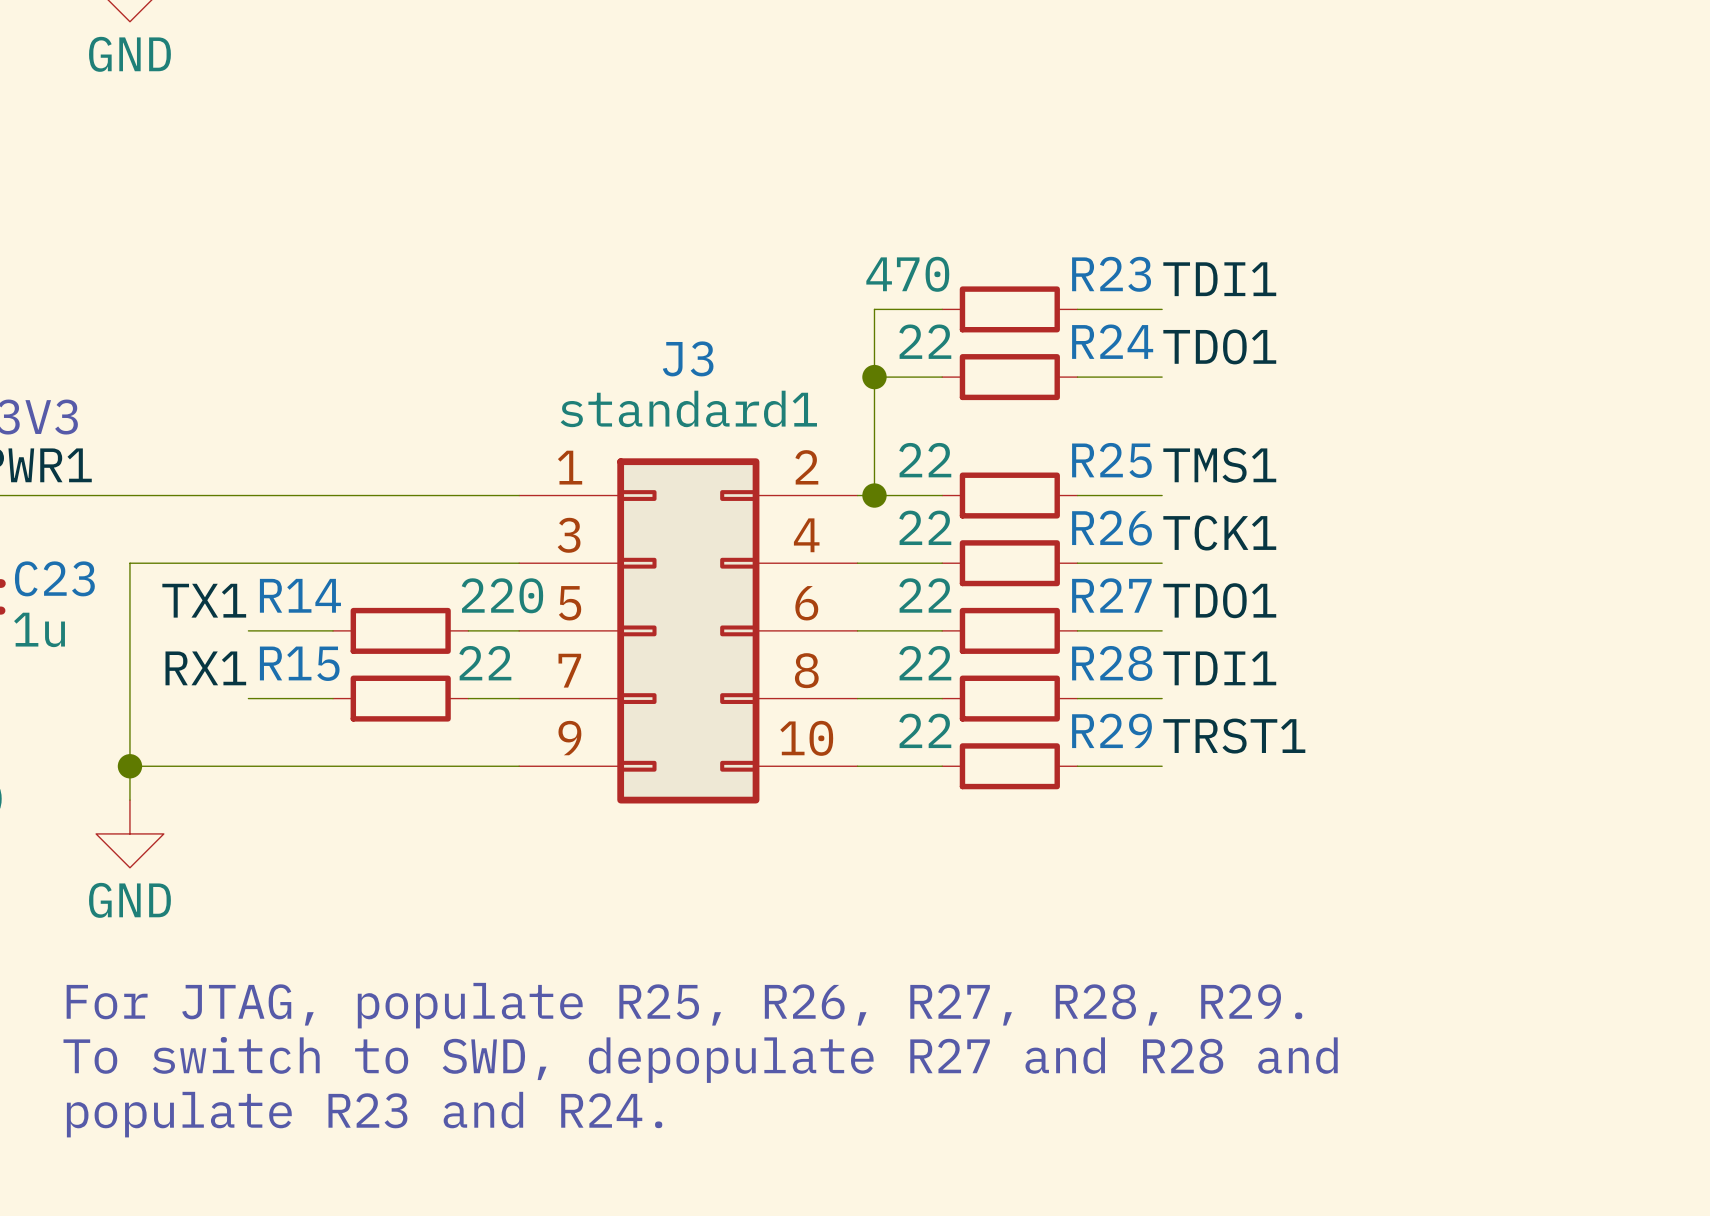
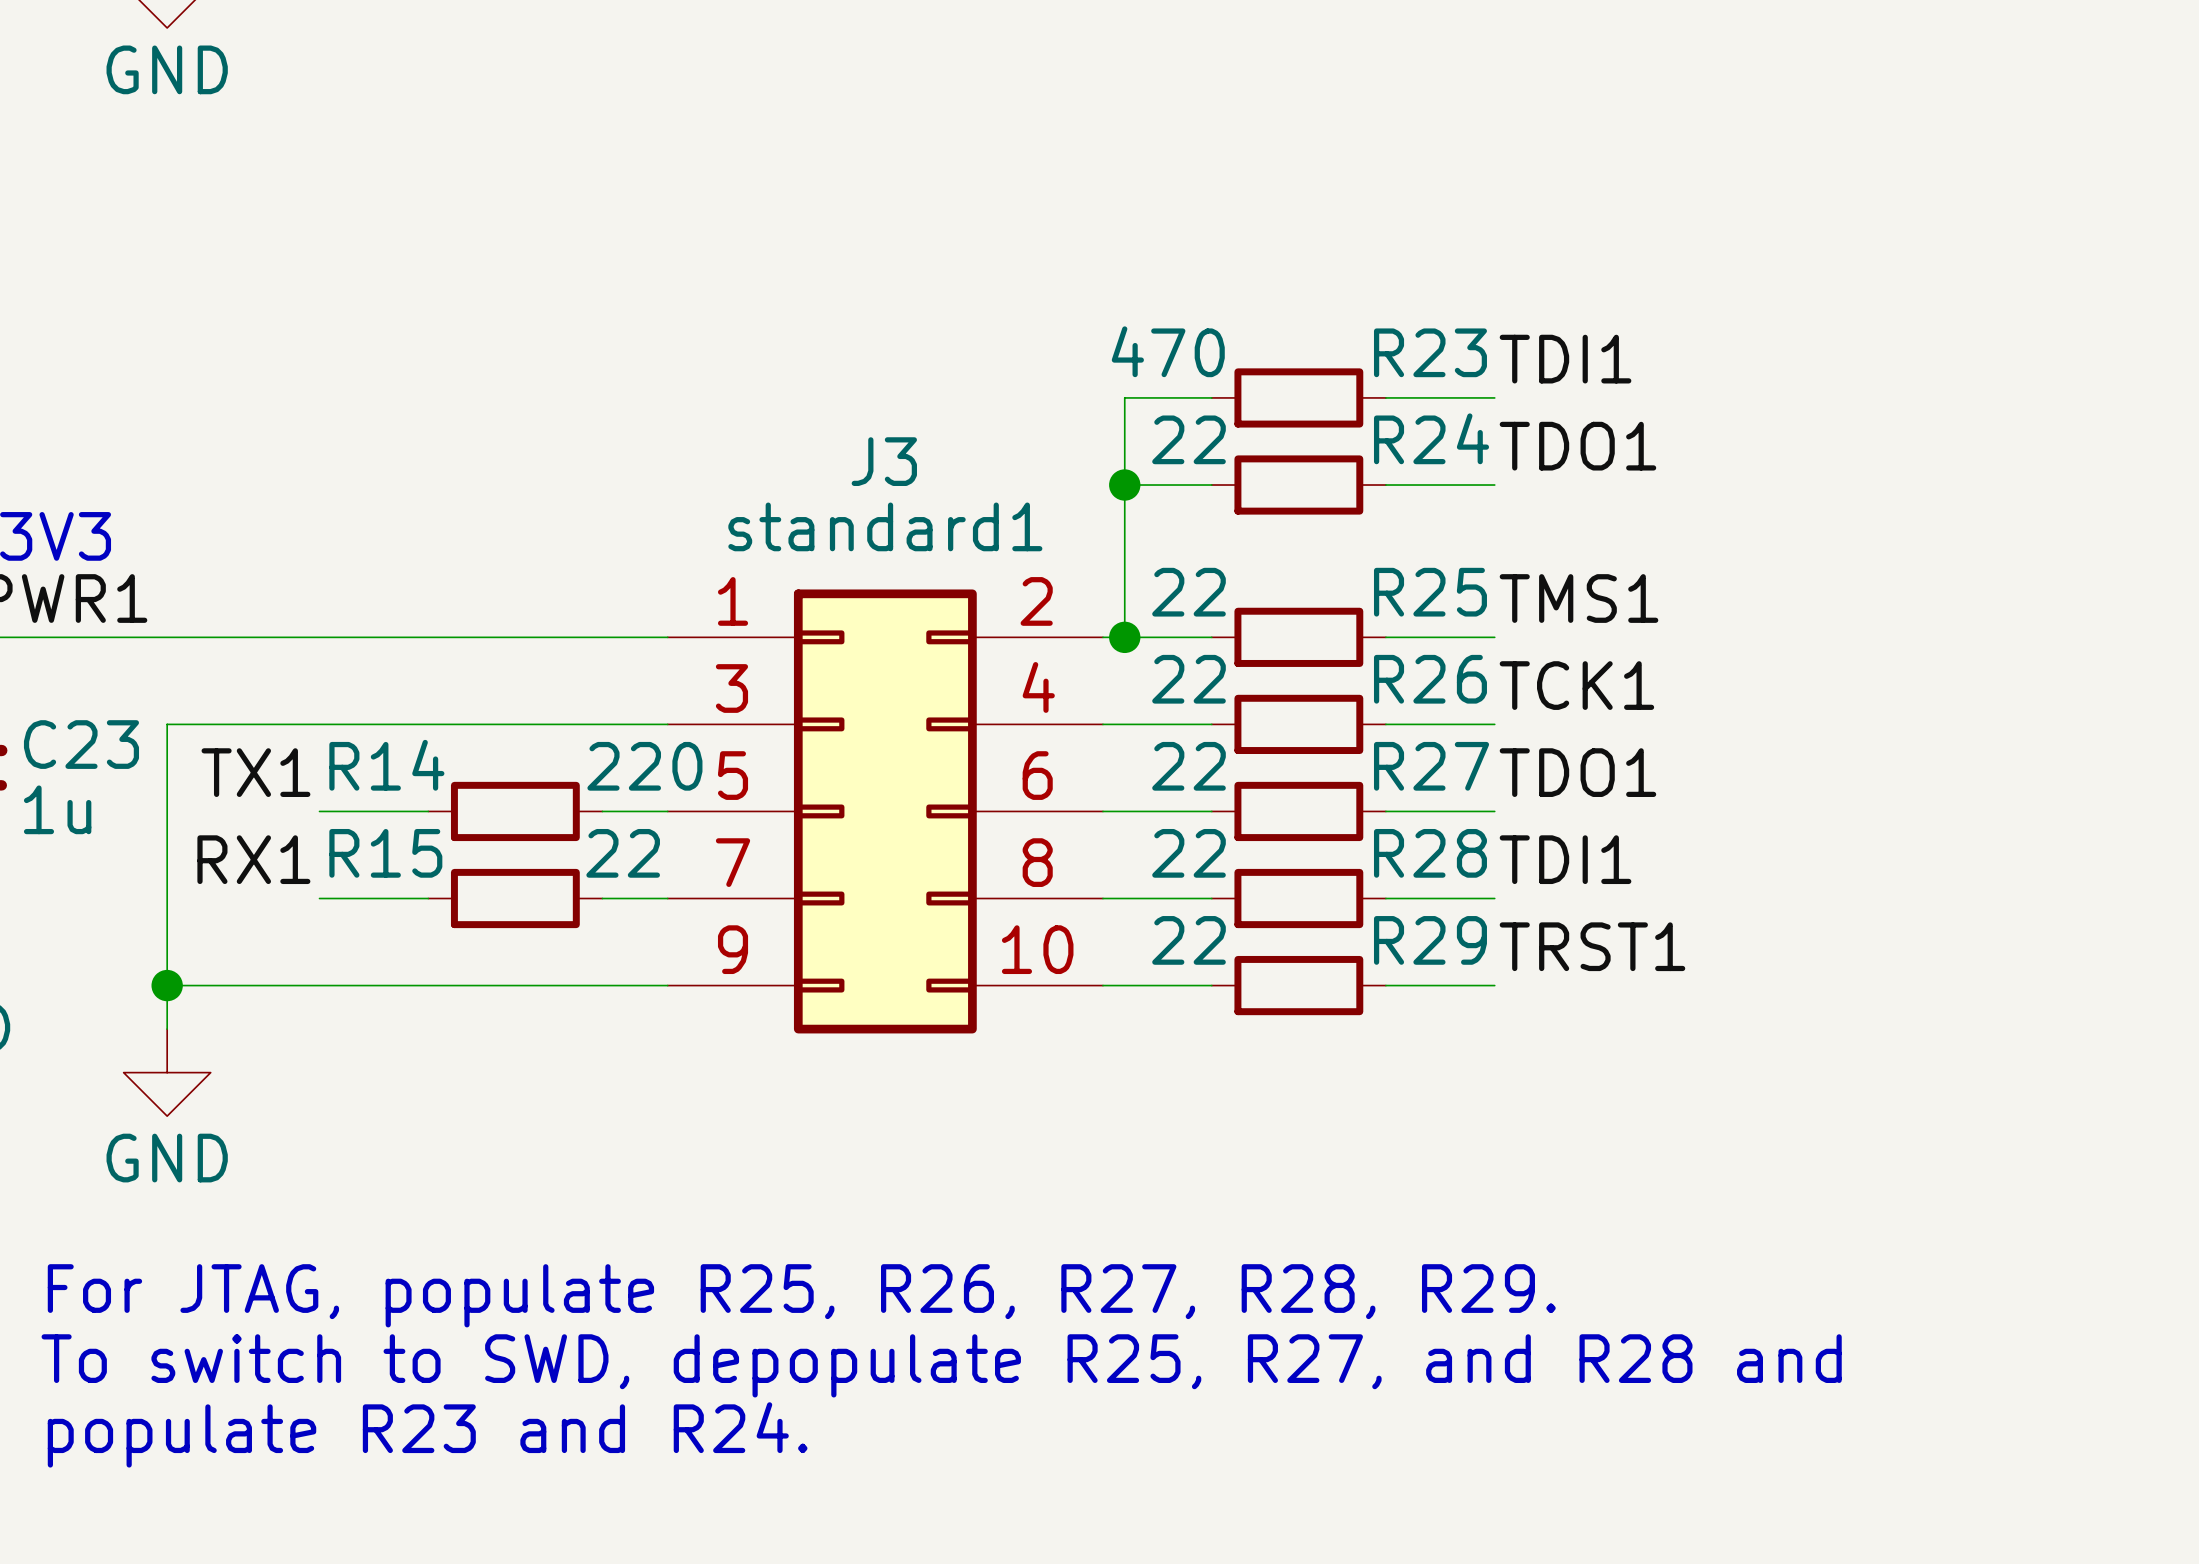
text position: For JTAG, populate R25, R26, R27, R28, R29. (684, 1005) -> For JTAG, populate R25, R26, R27, R28, R29. (801, 1295)
text: To switch to SWD, depopulate R27 and R28 and (700, 1059) -> To switch to SWD, depopulate R25, R27, and R28 and (941, 1365)
text position: populate R23 and R24. (364, 1114) -> populate R23 and R24. (427, 1434)

